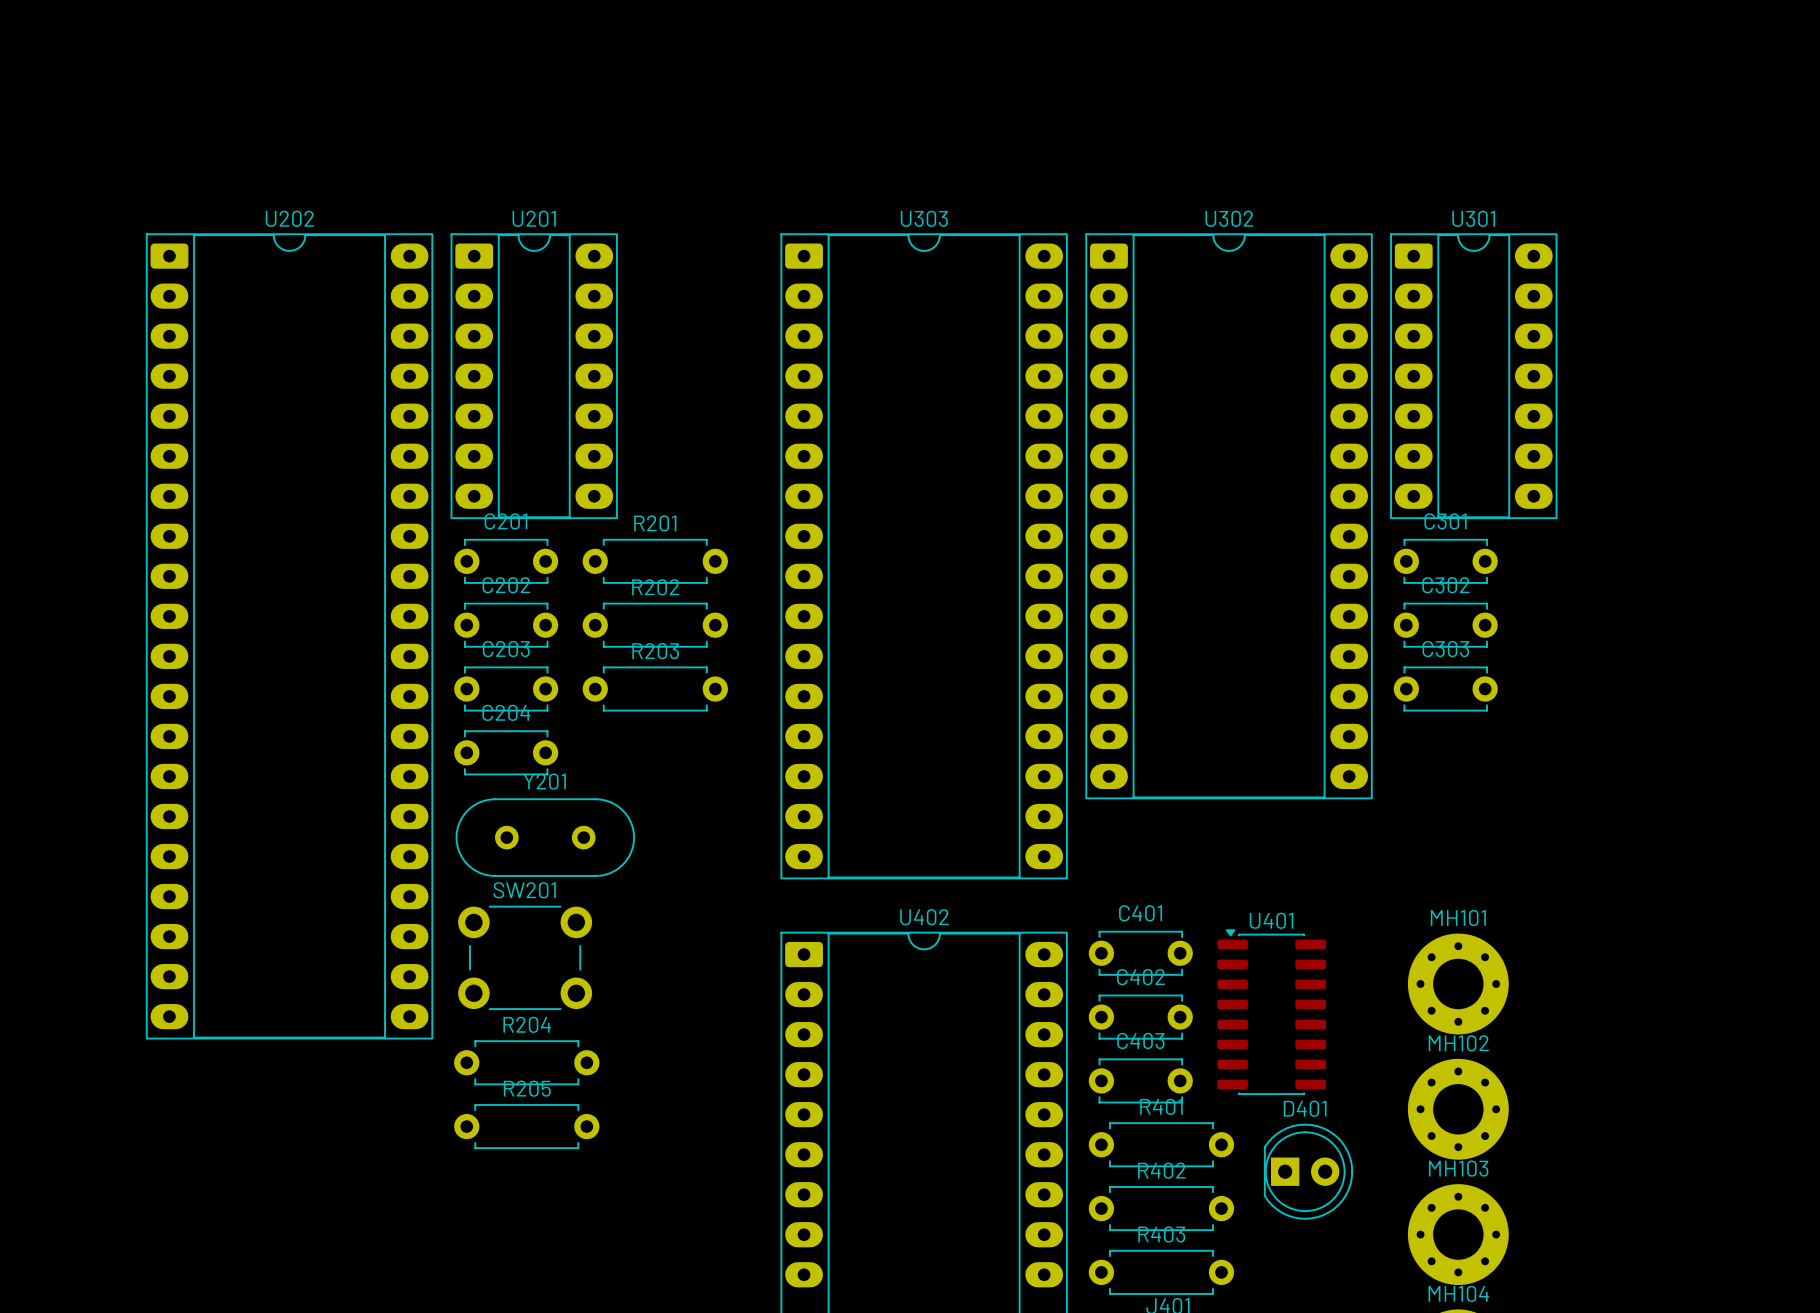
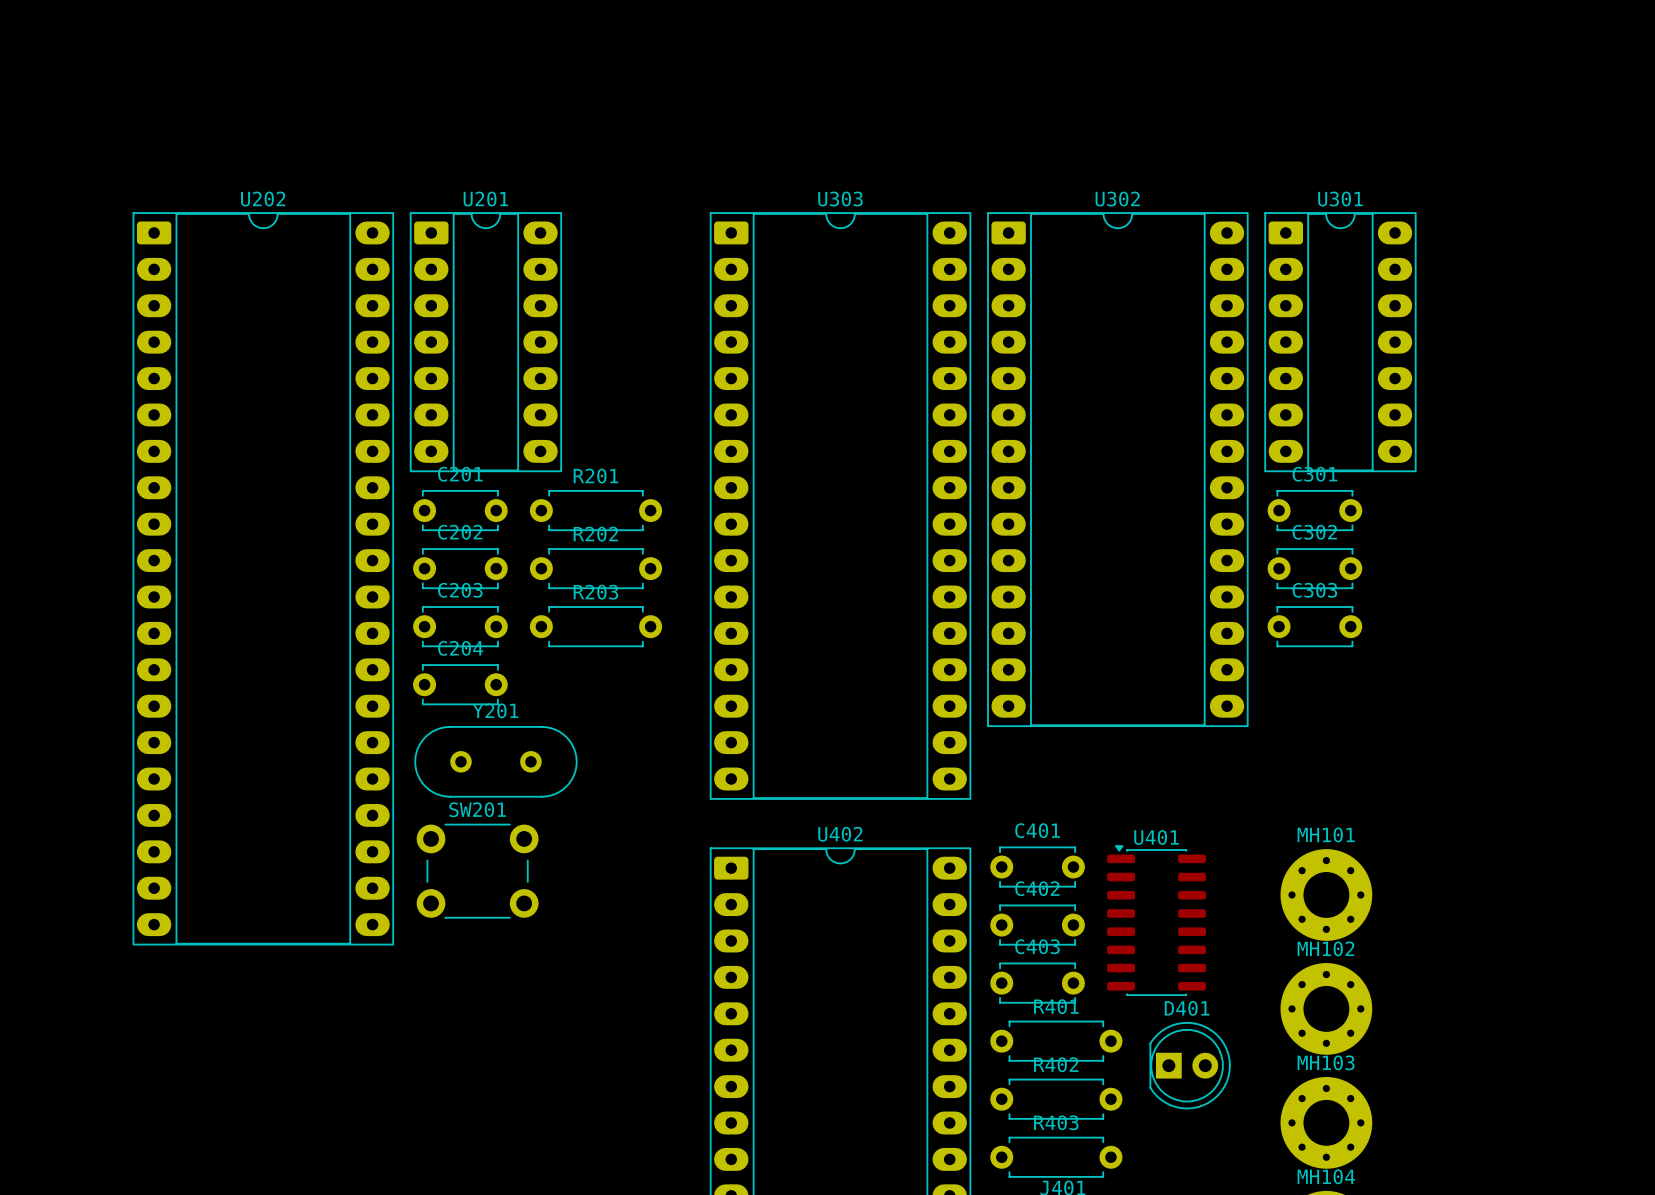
R204: (526, 1062) -> none
R205: (526, 1126) -> none

